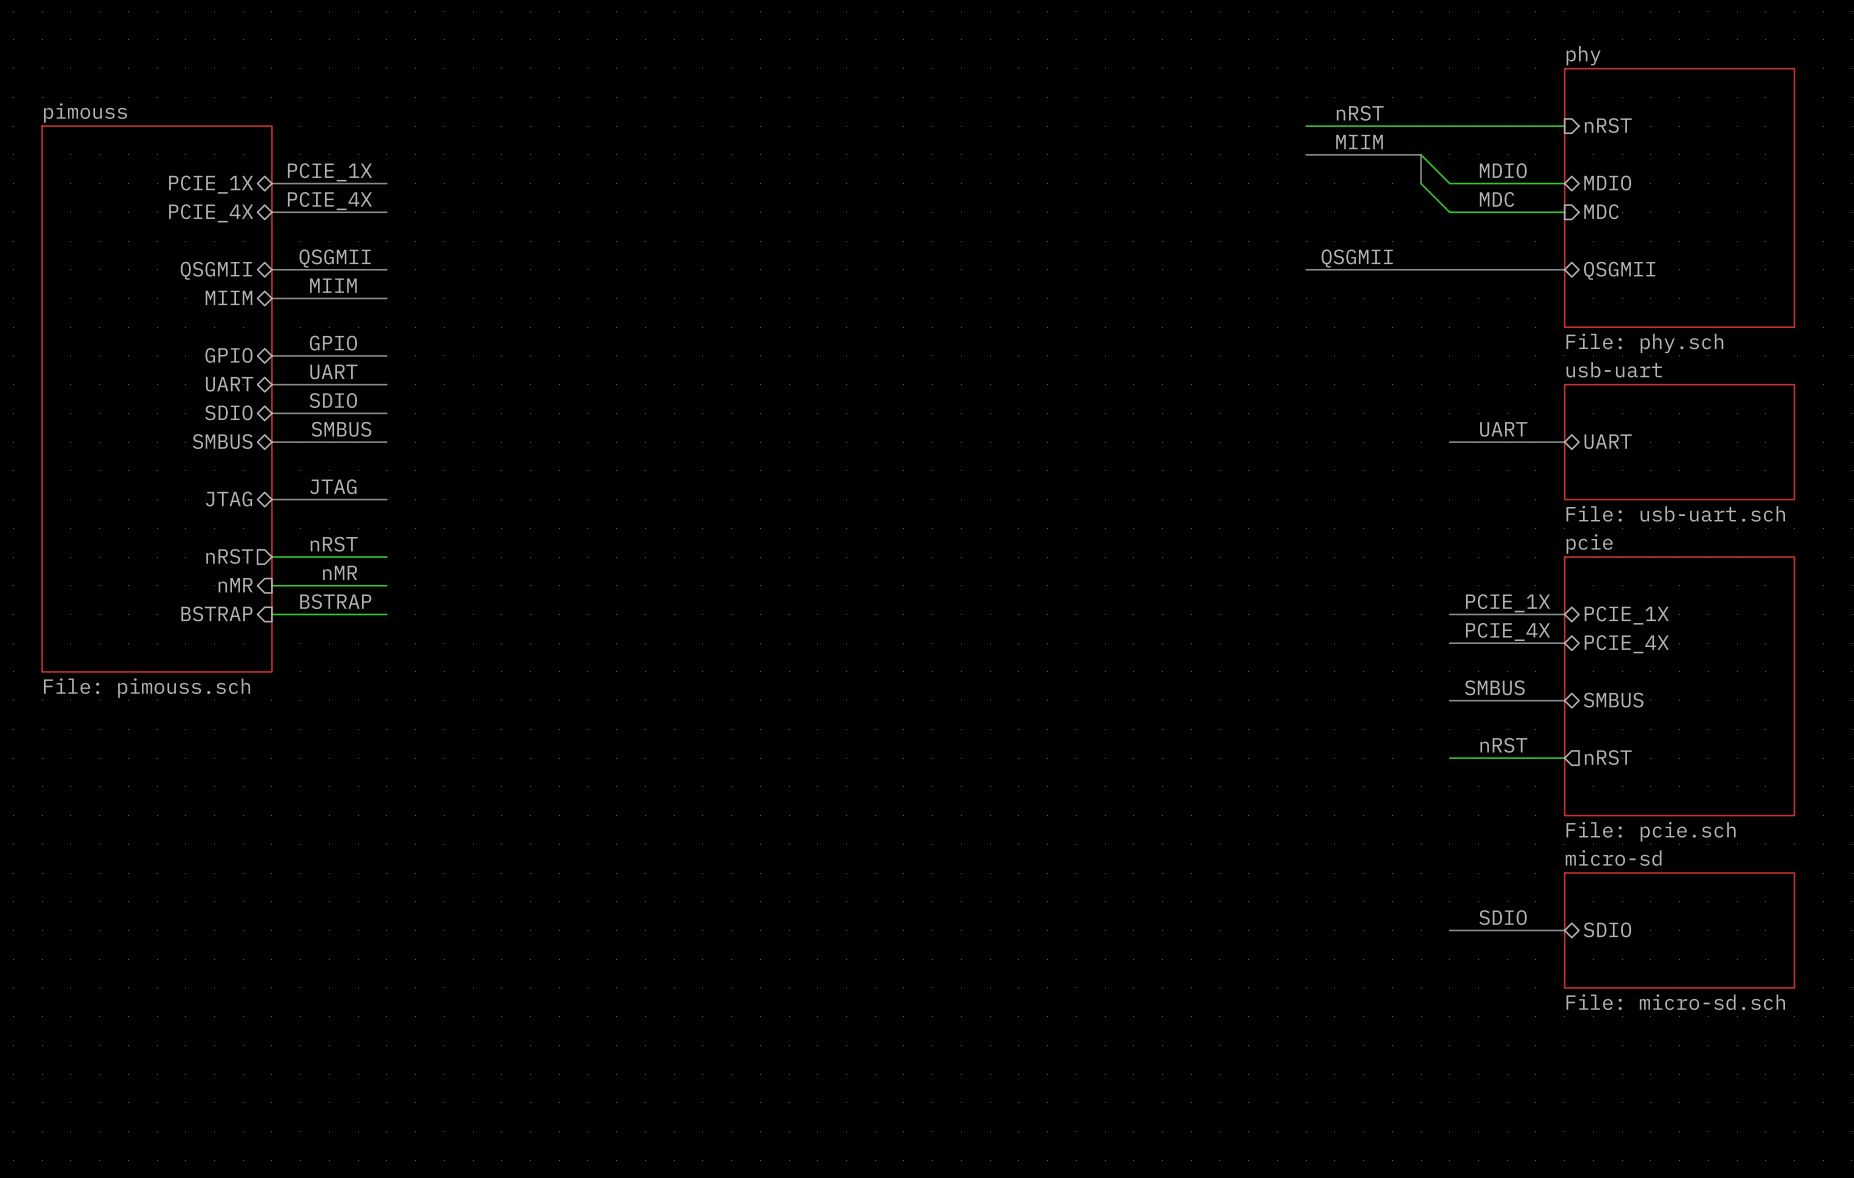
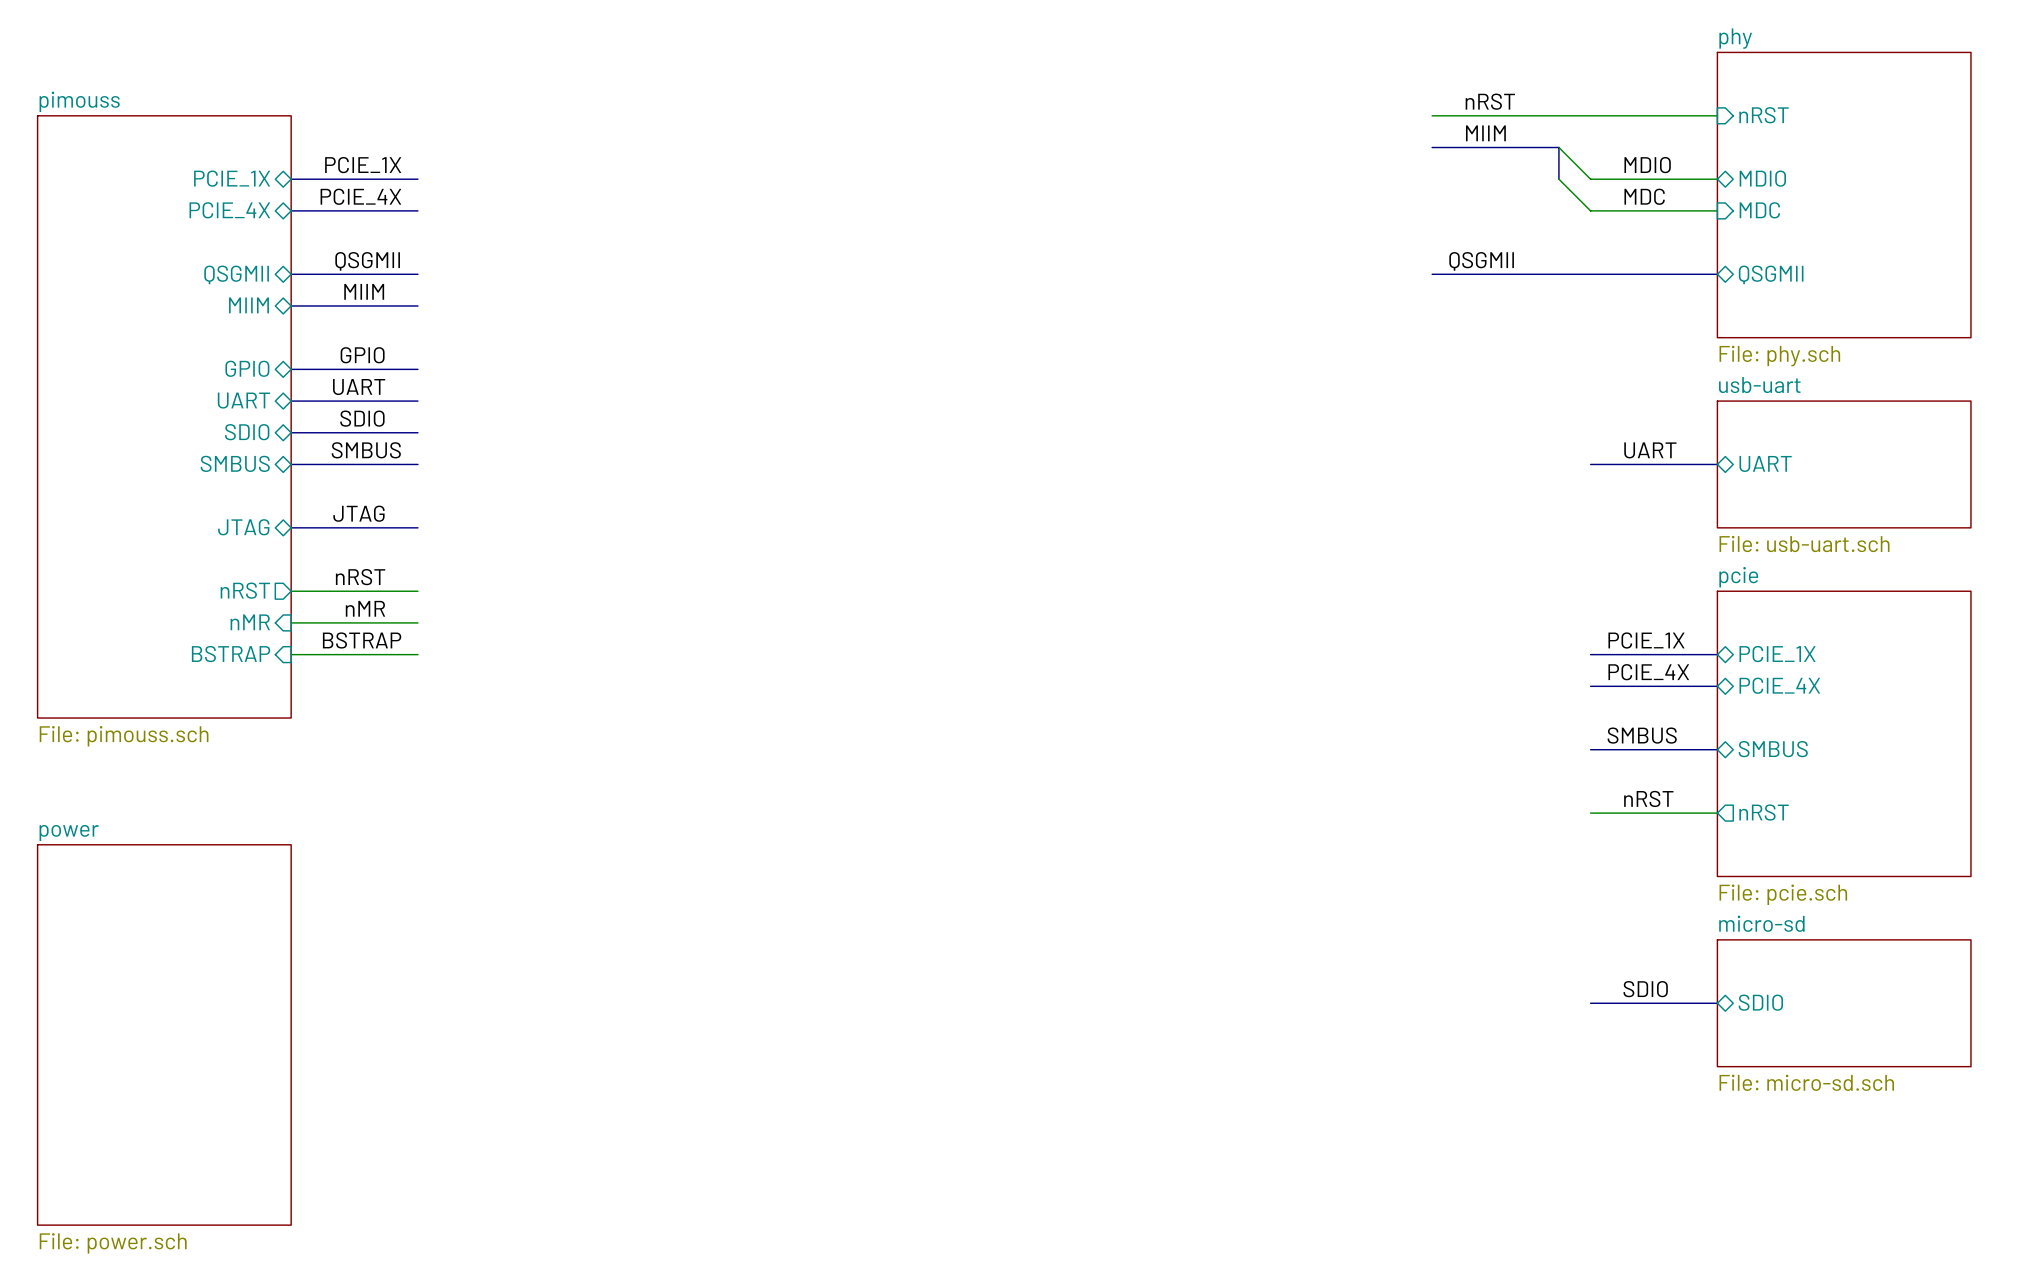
sheet power: none -> File: power.sch (164, 1034)

